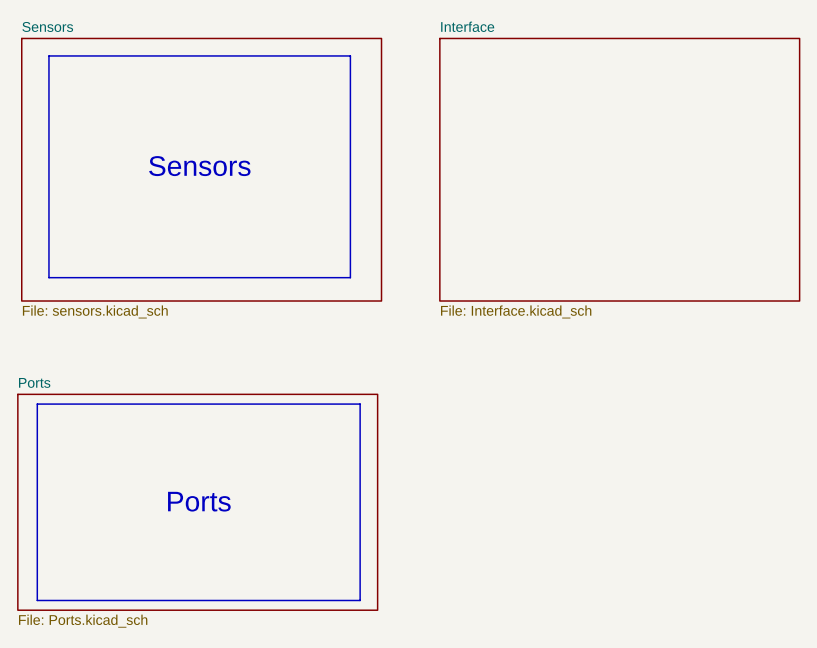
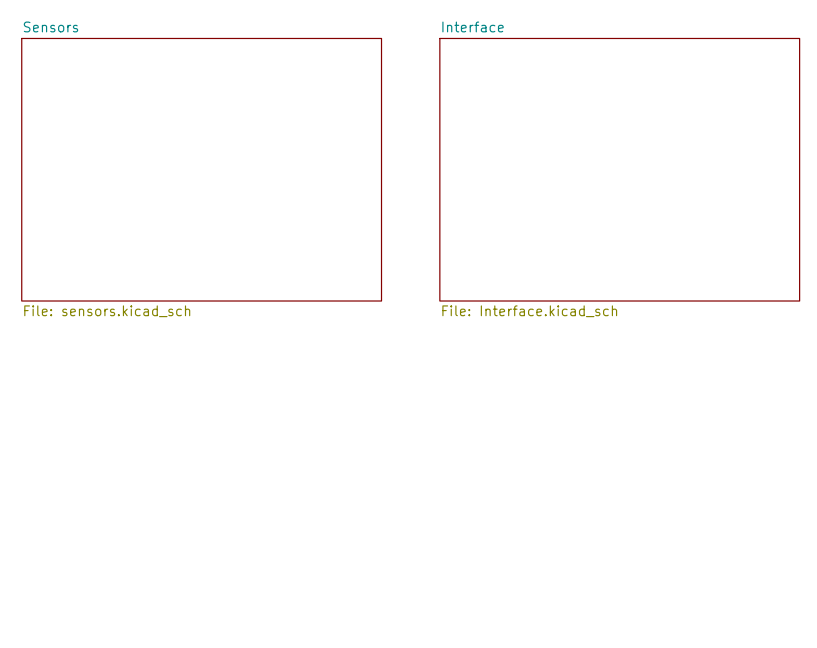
line: (48, 55) (350, 55) (350, 277) (48, 277) (48, 55) -> none
text: Sensors (199, 166) -> none
line: (37, 404) (360, 404) (360, 600) (37, 600) (37, 404) -> none
text: Ports (199, 501) -> none
sheet Ports: File: Ports.kicad_sch (197, 502) -> none

